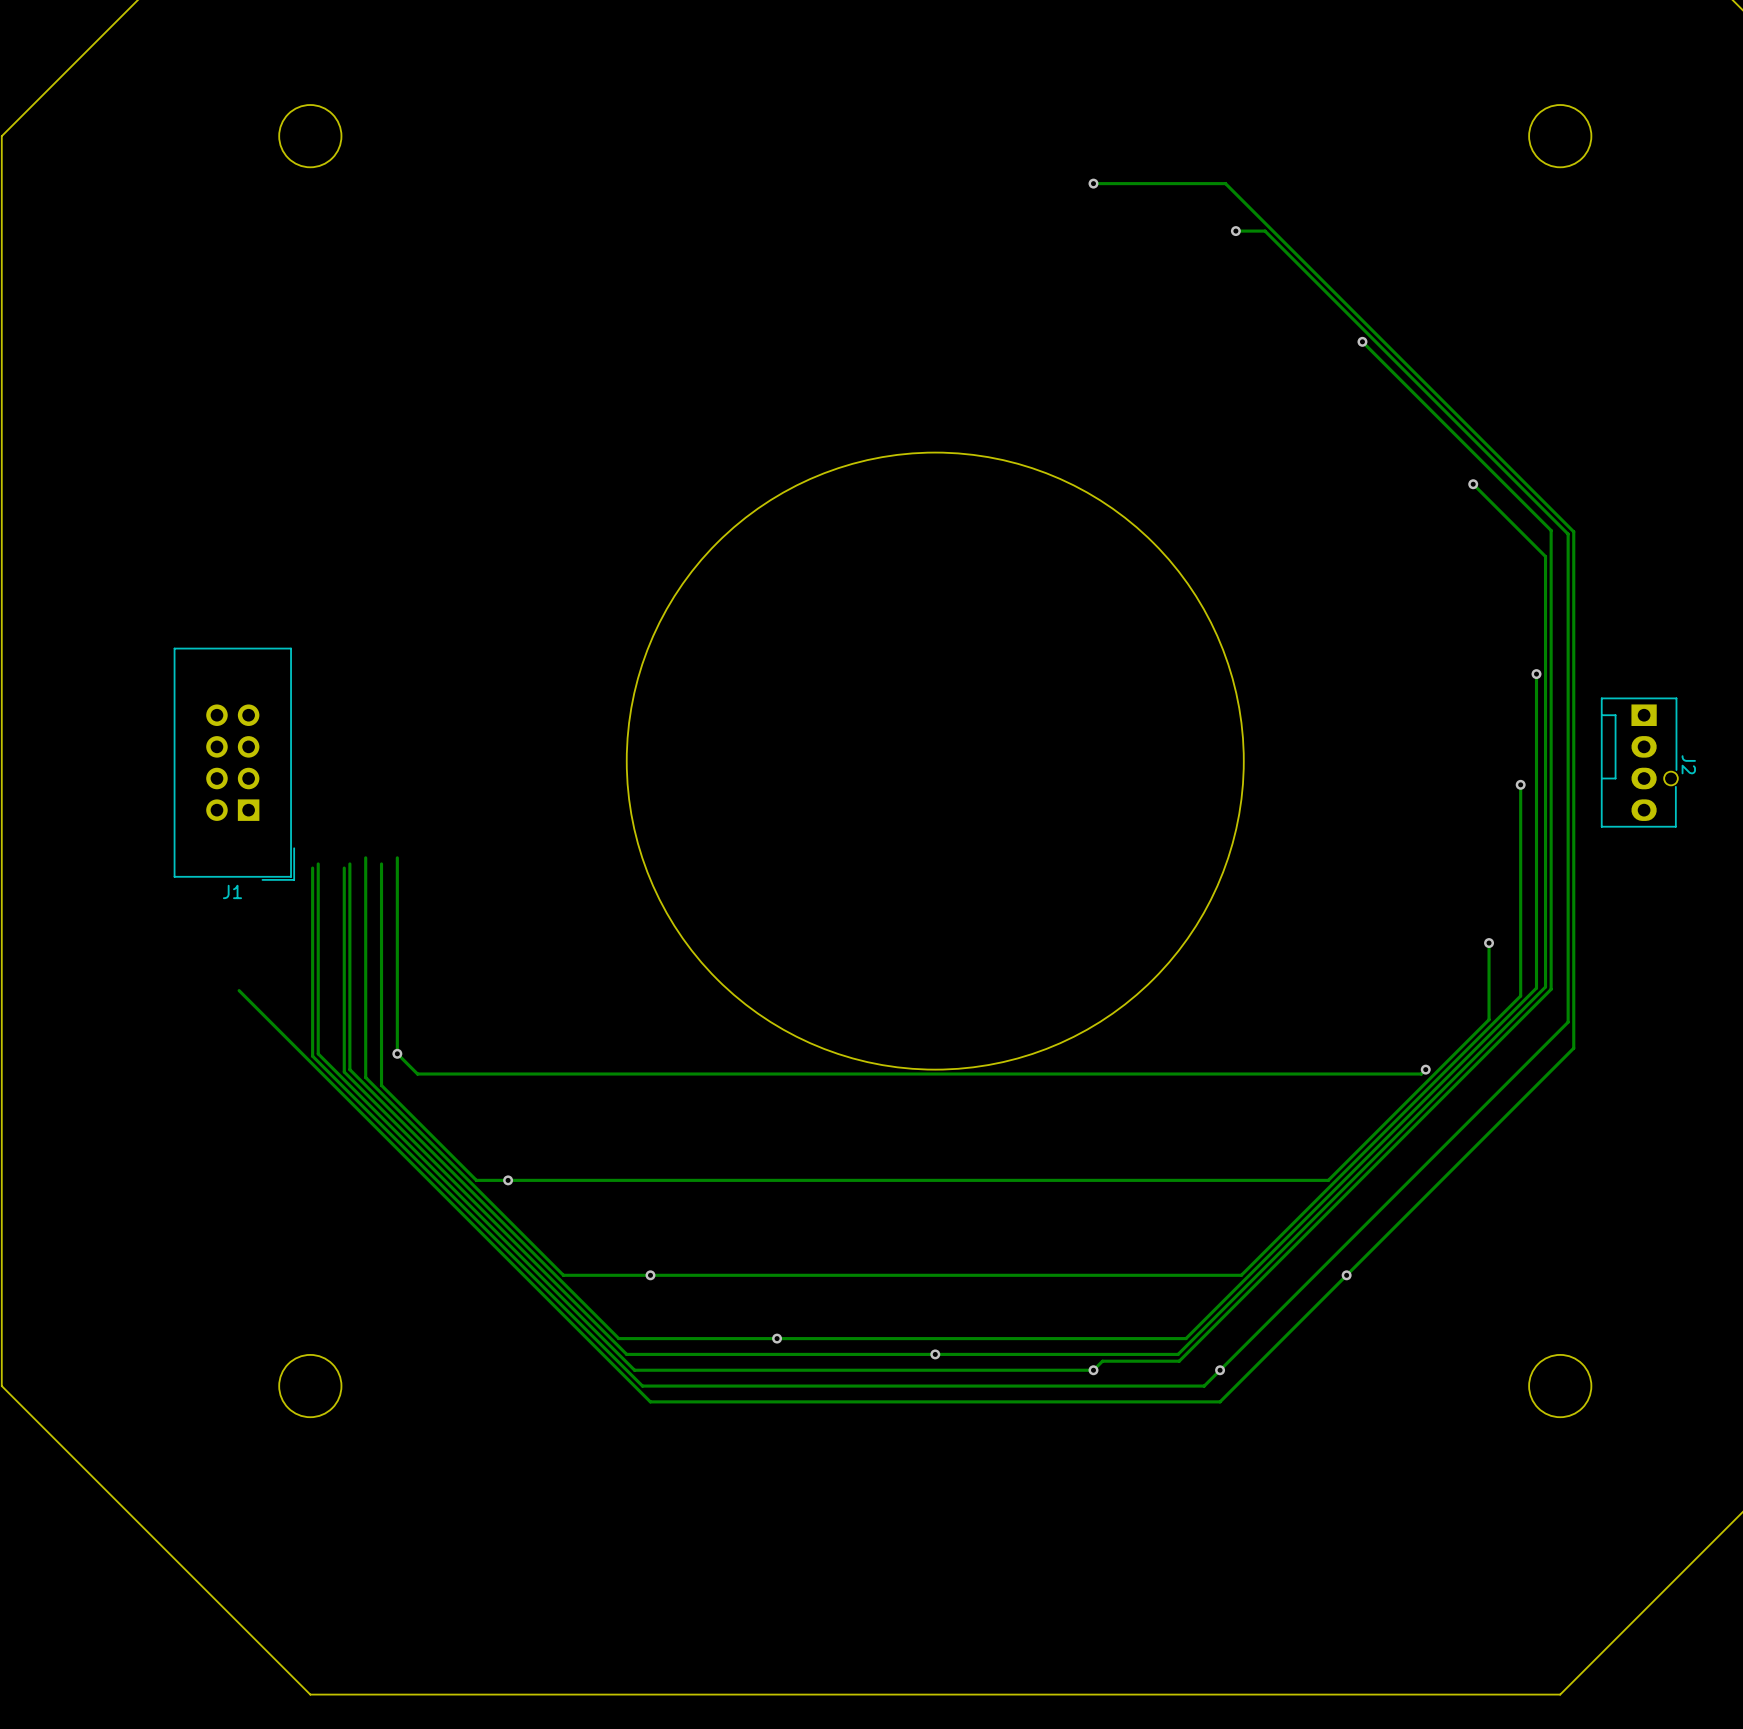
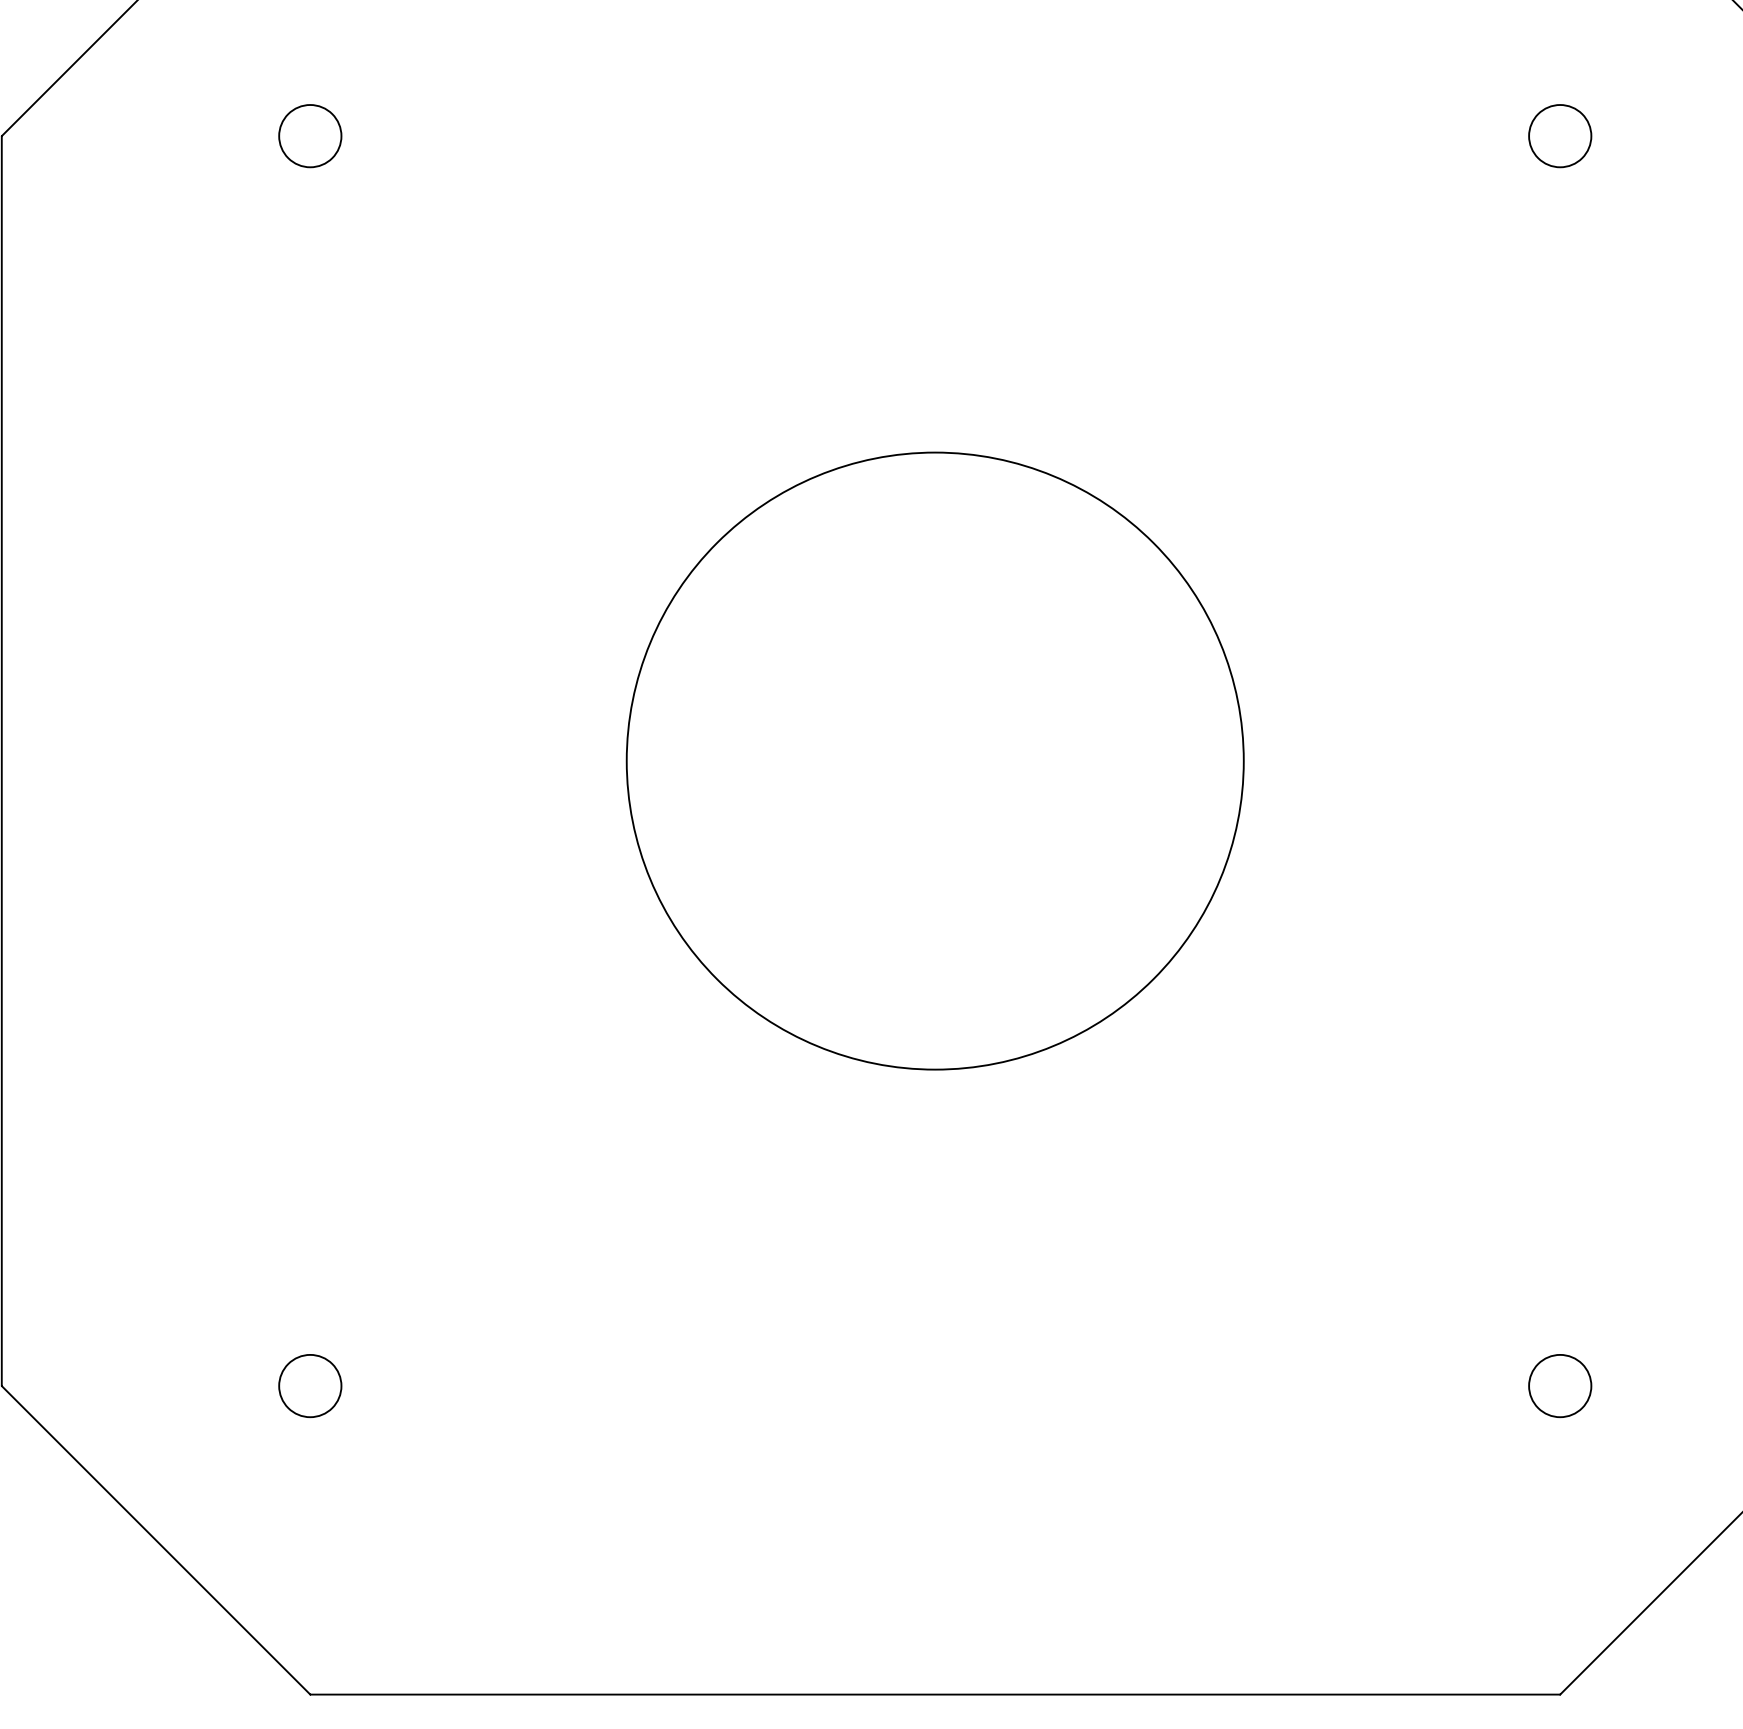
track: (1093, 183) (1225, 183) (1573, 531) (1573, 1048) (1220, 1401) (650, 1401) (239, 990) -> none
via: (1093, 183) -> none
track: (1235, 231) (1265, 231) (1568, 534) (1568, 1022) (1204, 1386) (642, 1386) (312, 1056) (312, 868) -> none
via: (1235, 231) -> none
track: (1362, 341) (1551, 530) (1551, 989) (1179, 1361) (1102, 1361) (1093, 1370) (634, 1370) (318, 1053) (318, 863) -> none
via: (1362, 341) -> none
track: (1473, 484) (1545, 556) (1545, 986) (1178, 1354) (626, 1354) (344, 1071) (344, 868) -> none
via: (1473, 484) -> none
track: (1536, 674) (1536, 988) (1186, 1338) (618, 1338) (349, 1069) (349, 863) -> none
via: (1536, 674) -> none
J2: (1639, 762) -> none
J1: (234, 764) -> none
track: (1520, 784) (1520, 995) (1241, 1275) (563, 1275) (365, 1077) (365, 857) -> none
via: (1520, 784) -> none
track: (397, 857) (397, 1053) (417, 1074) (1421, 1074) (1425, 1069) -> none
track: (381, 863) (381, 1085) (476, 1180) (1328, 1180) (1489, 1019) (1489, 943) -> none
via: (1489, 943) -> none
via: (397, 1053) -> none
via: (1425, 1069) -> none
via: (508, 1180) -> none
via: (650, 1275) -> none
via: (1346, 1275) -> none
via: (777, 1338) -> none
via: (935, 1354) -> none
via: (1093, 1370) -> none
via: (1220, 1370) -> none

